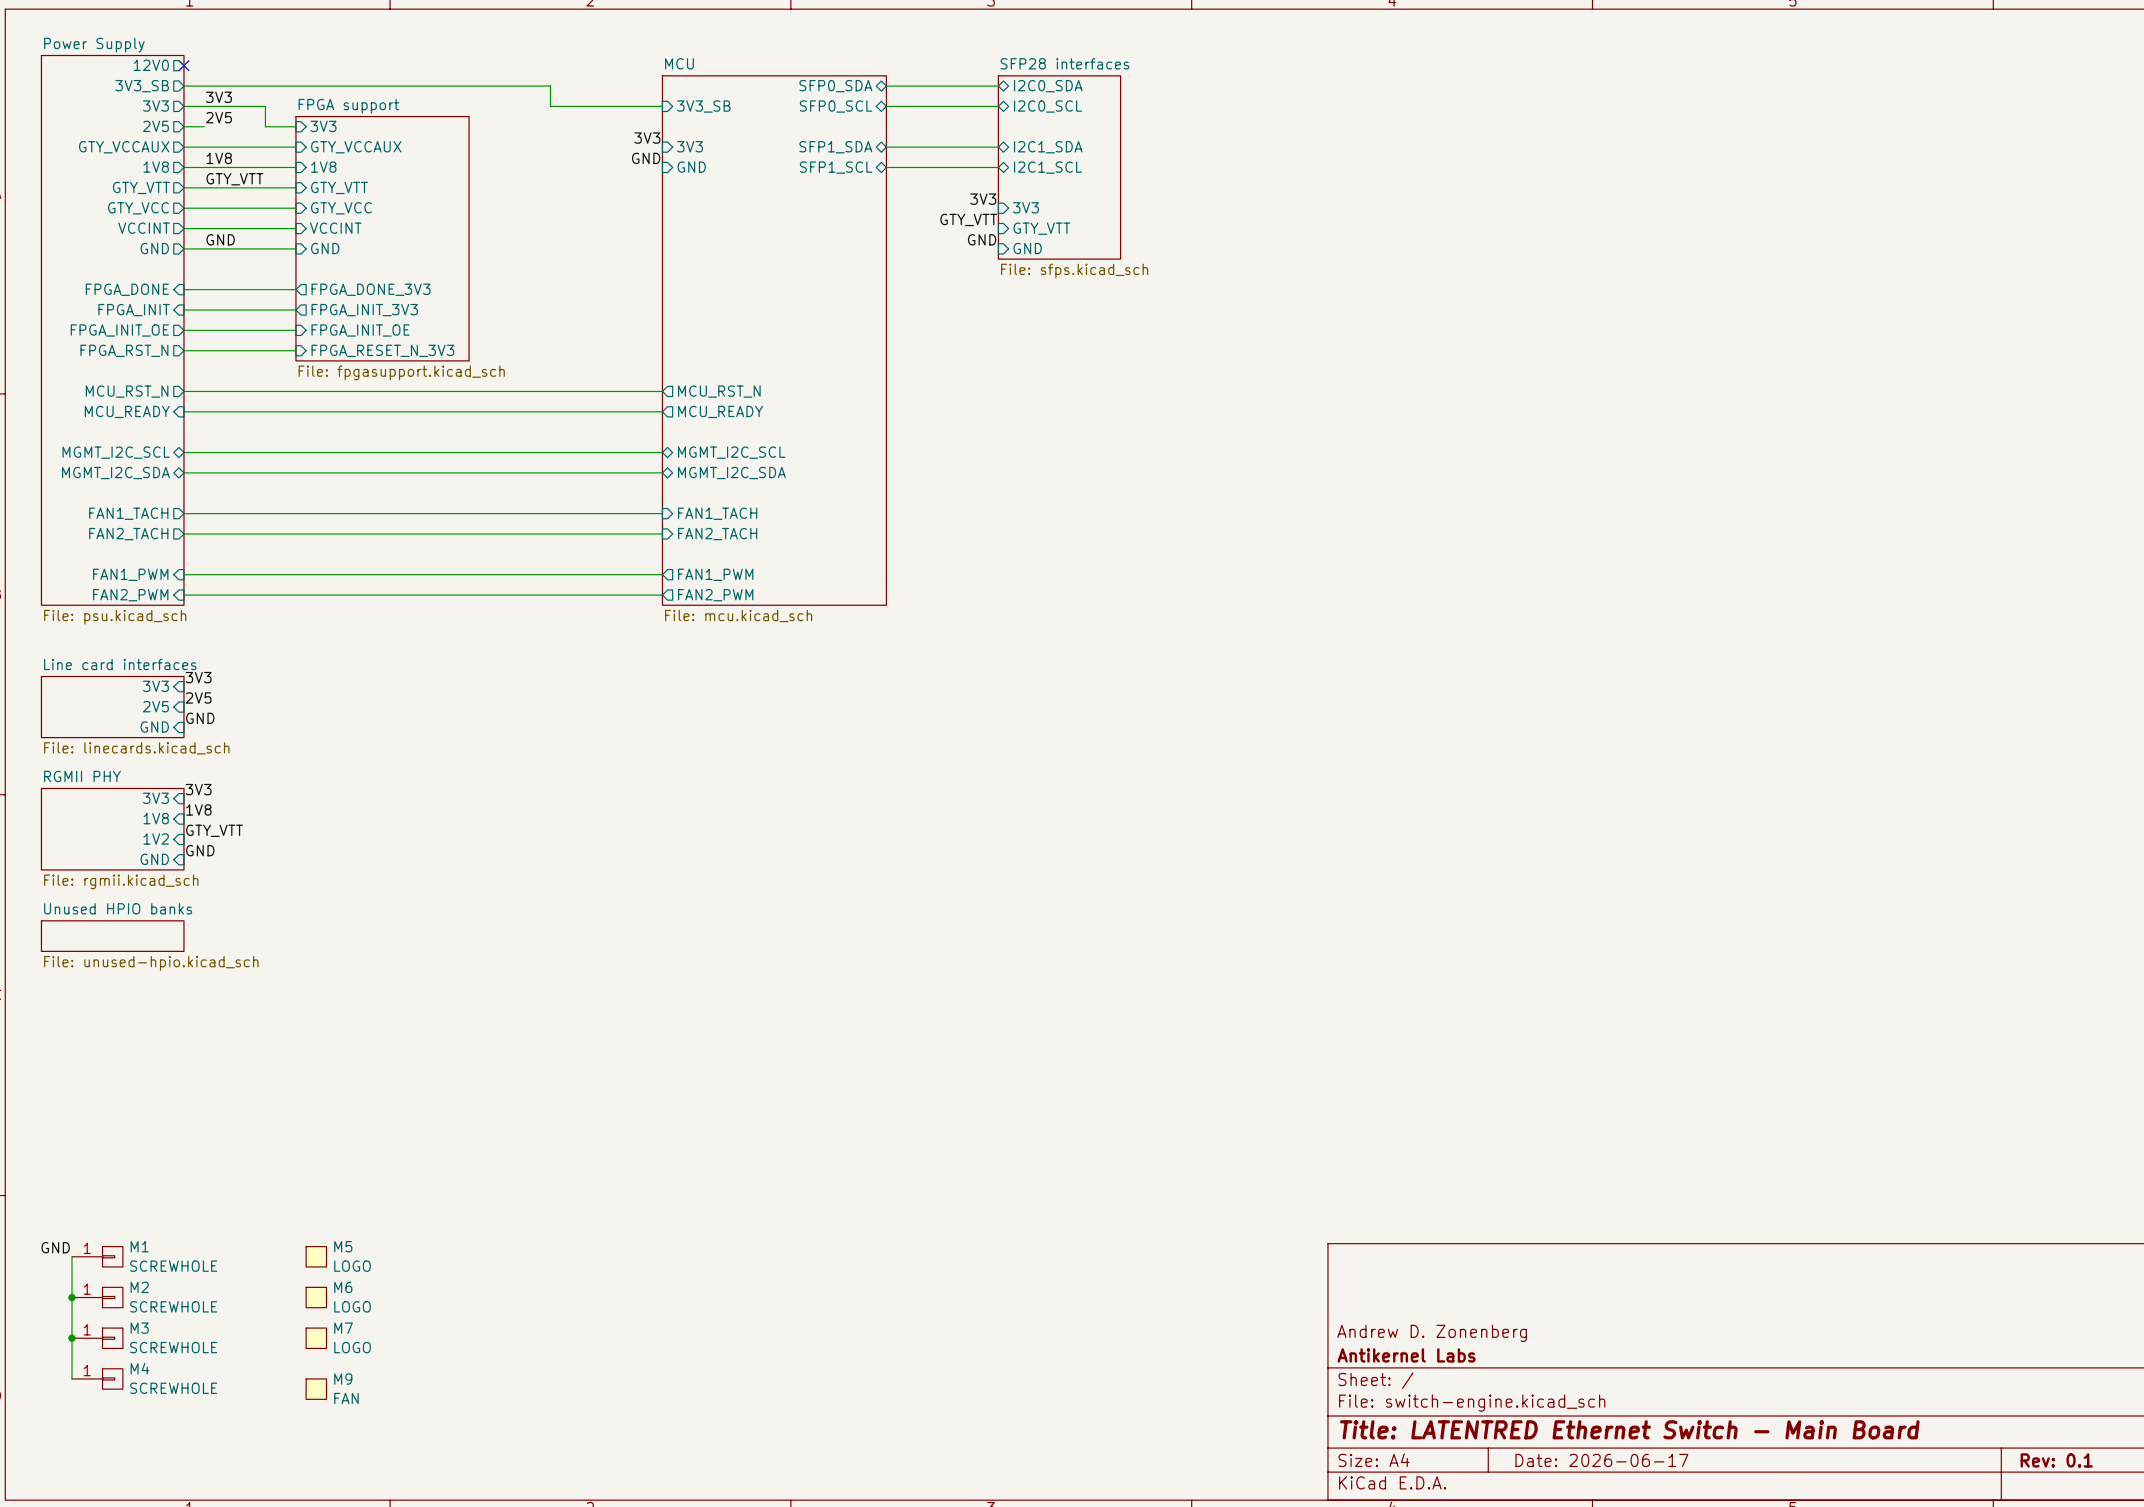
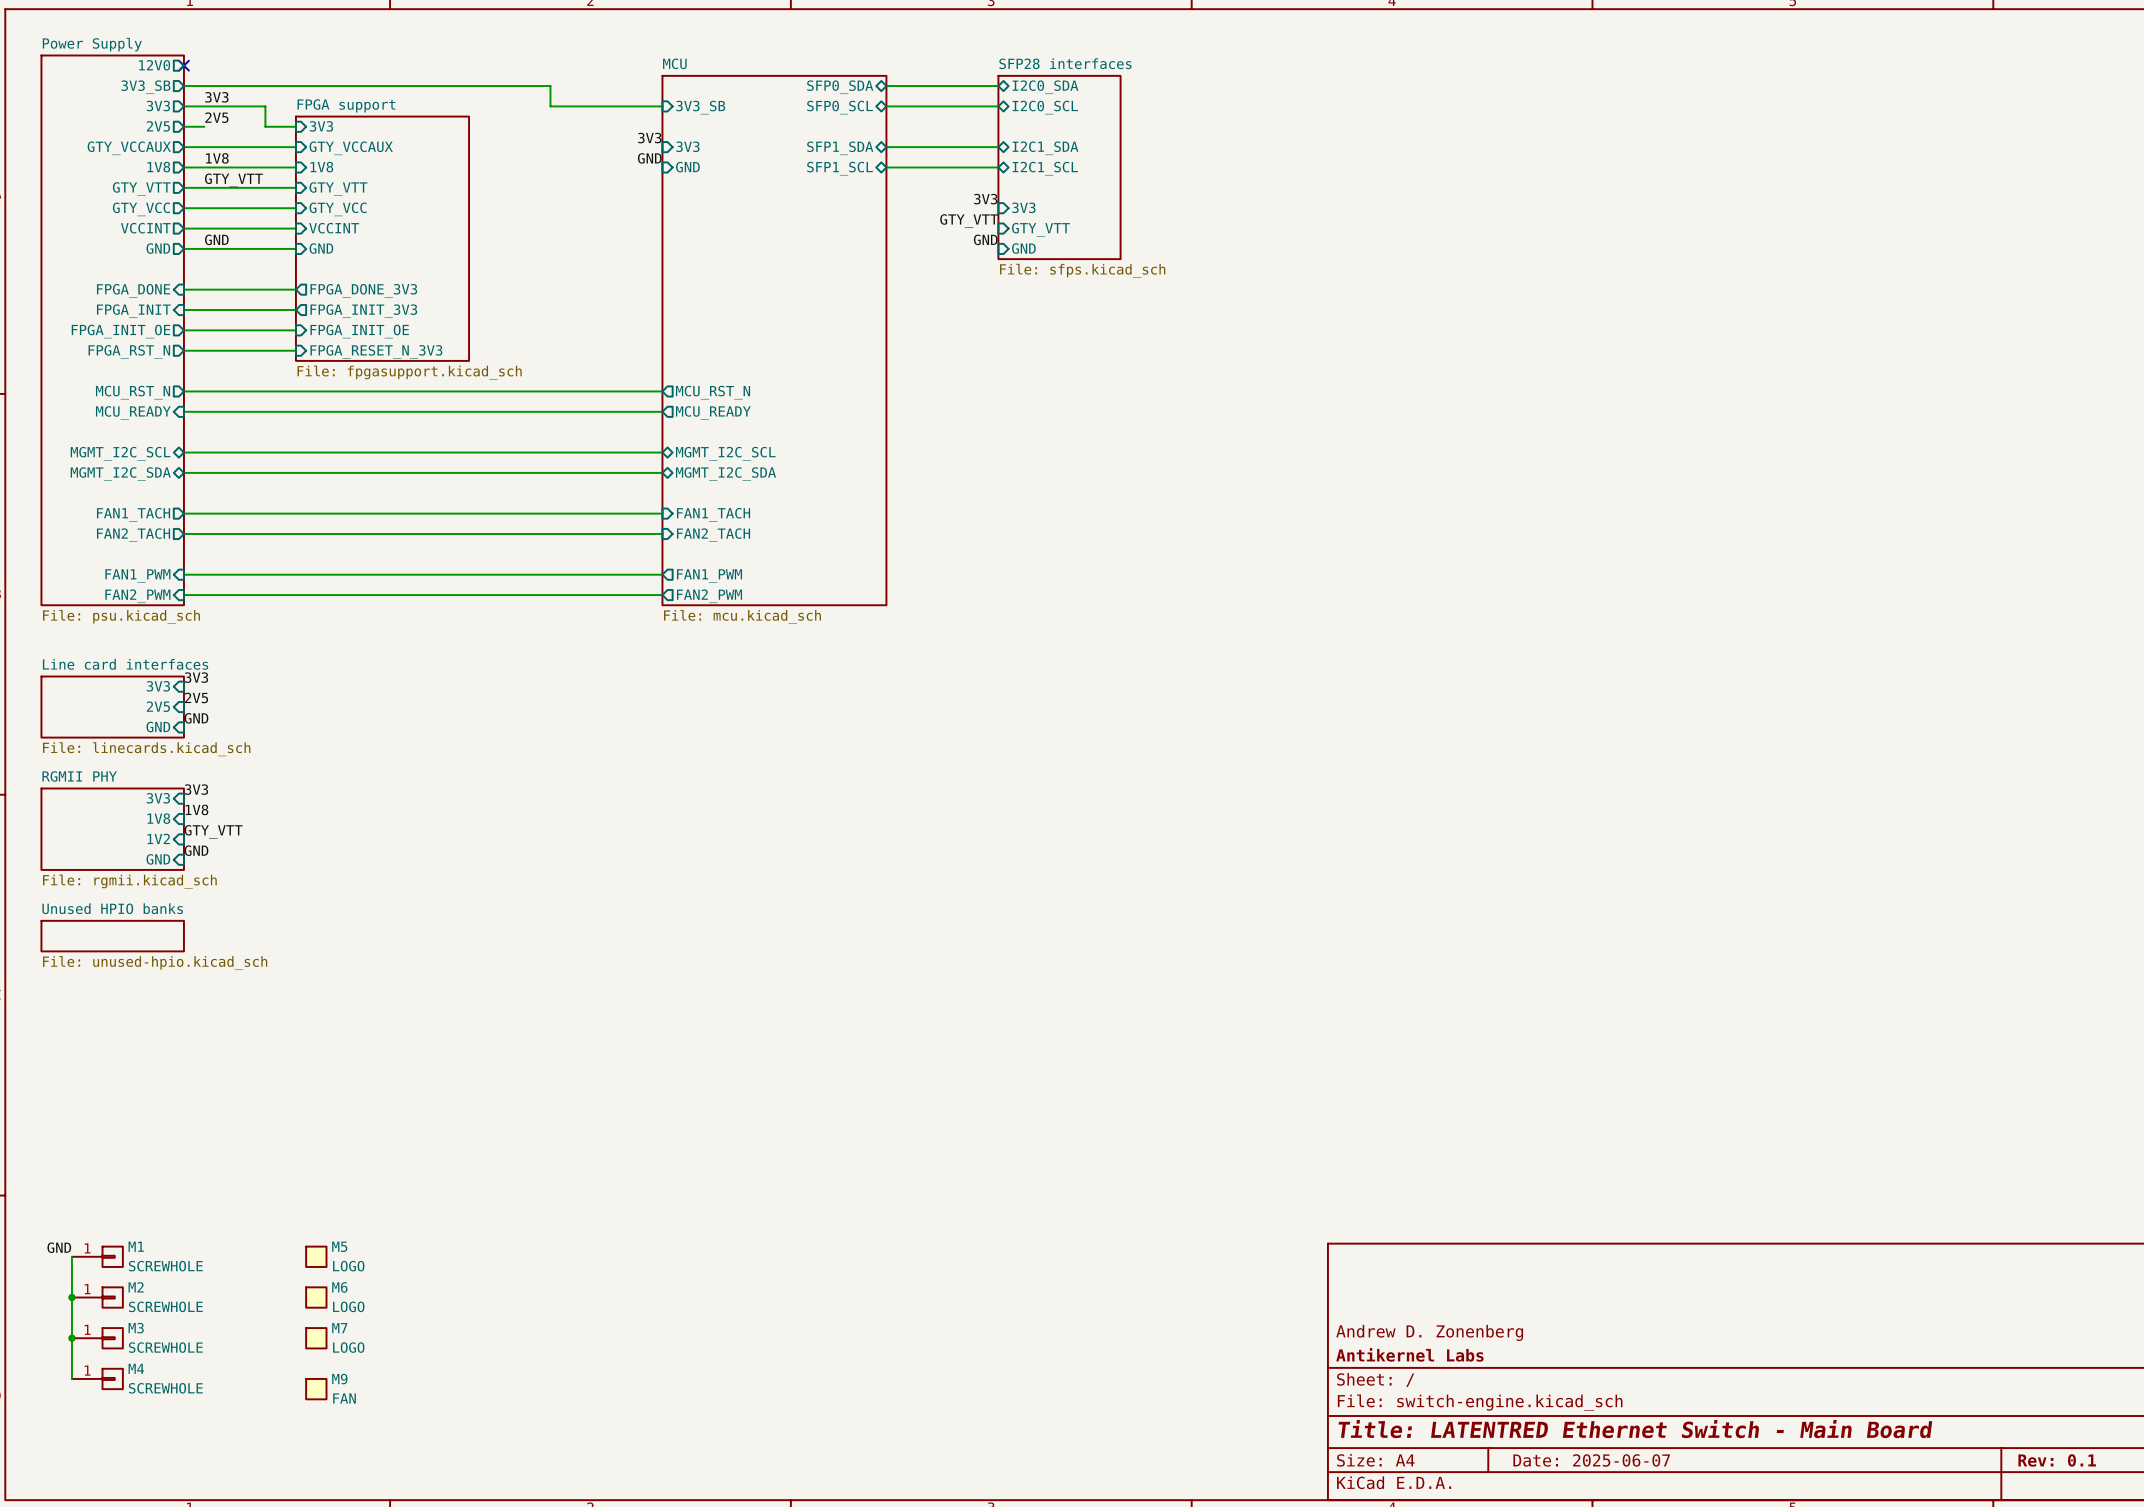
title block: Date: 2026-06-17 (1601, 1460) -> Date: 2025-06-07 (1591, 1460)

